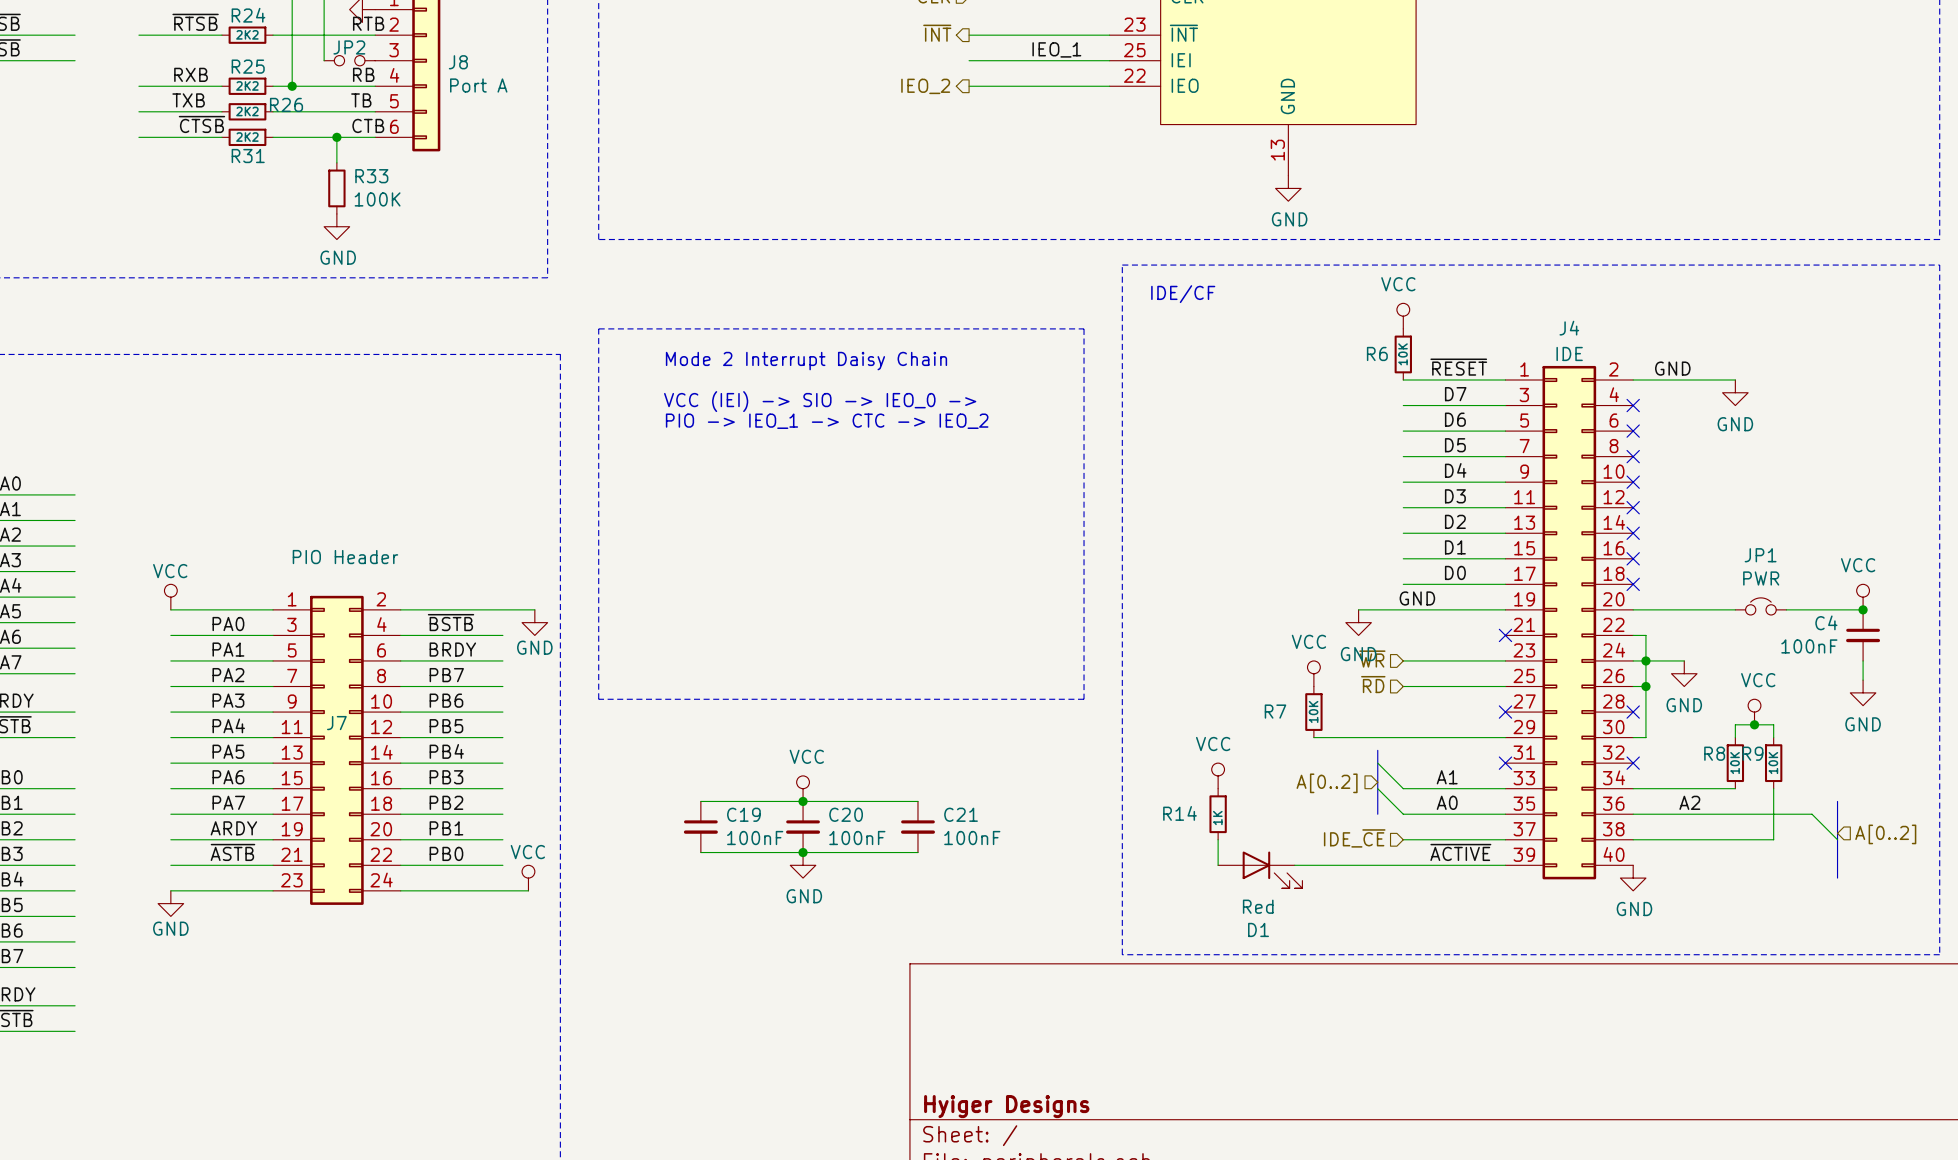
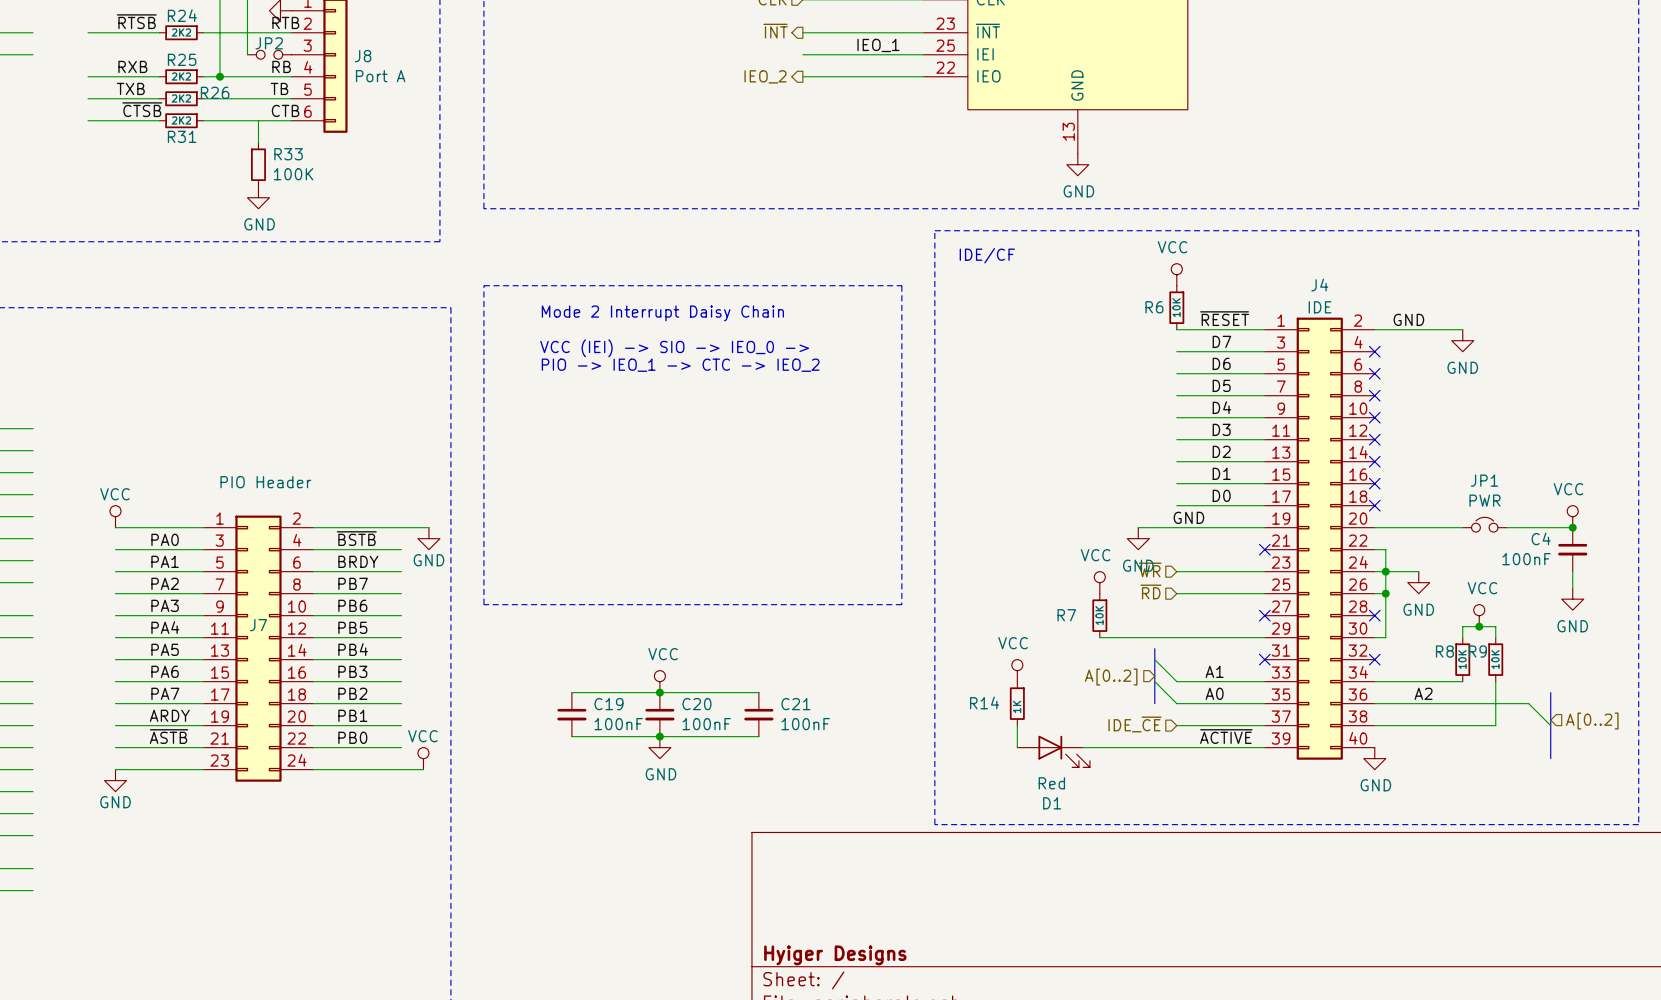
junction: (336, 137) -> none

